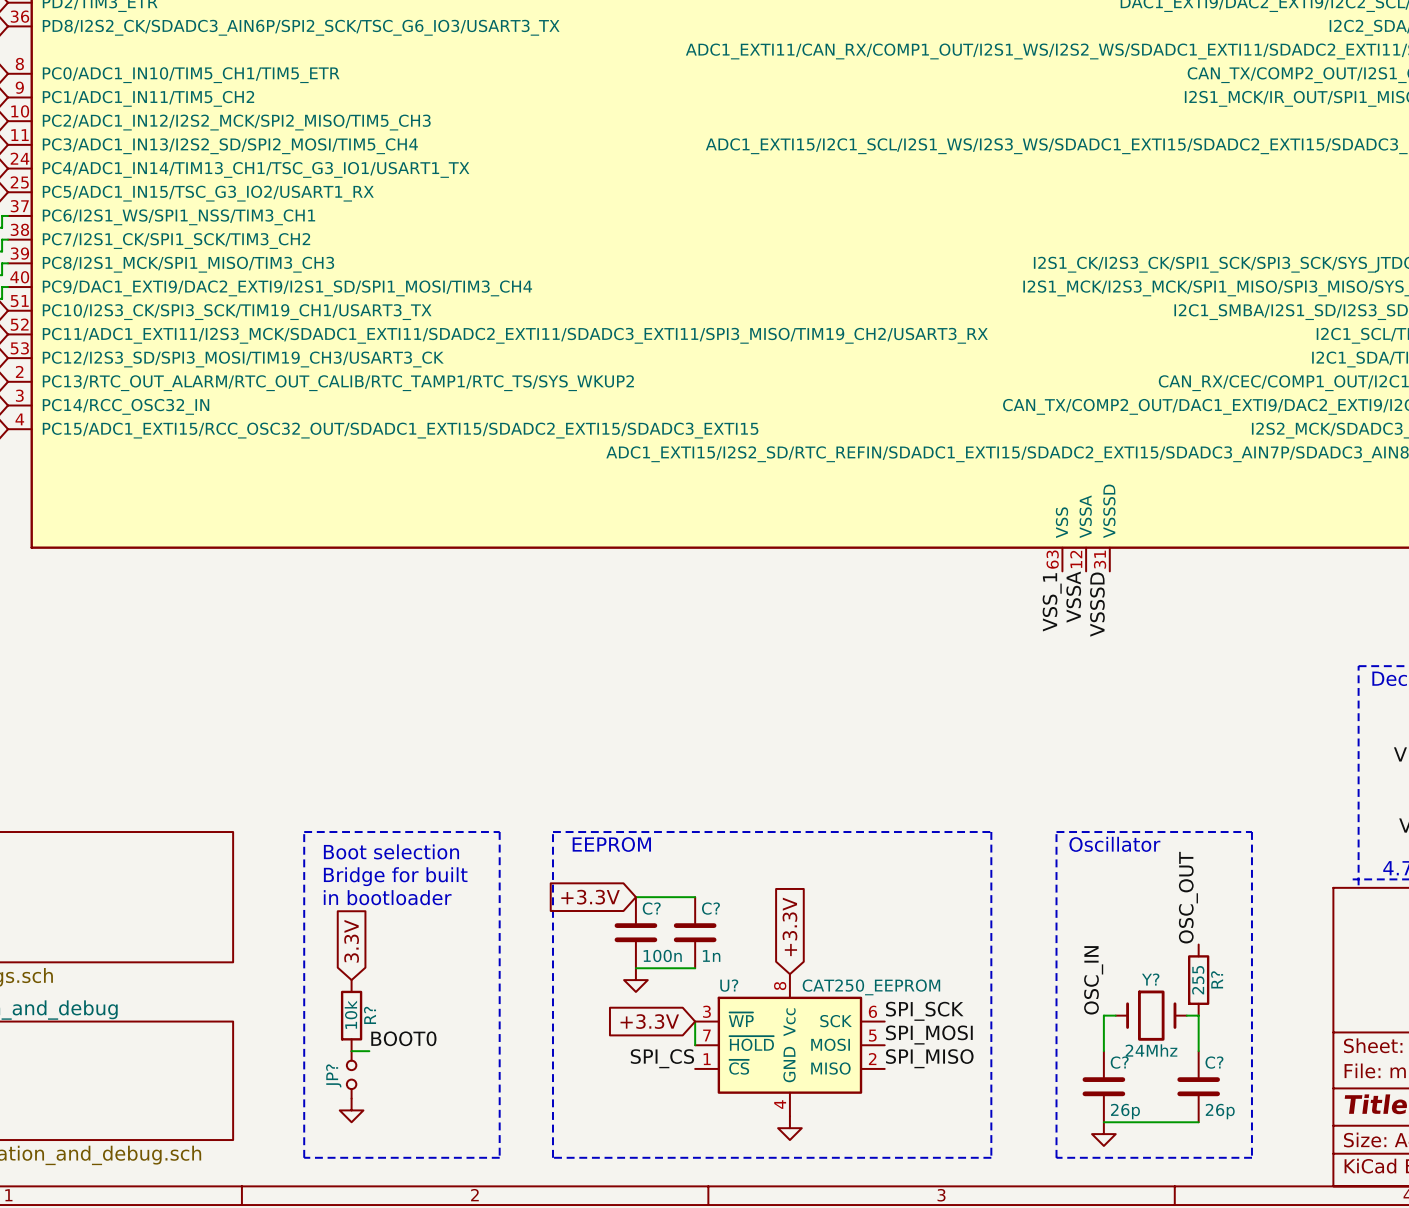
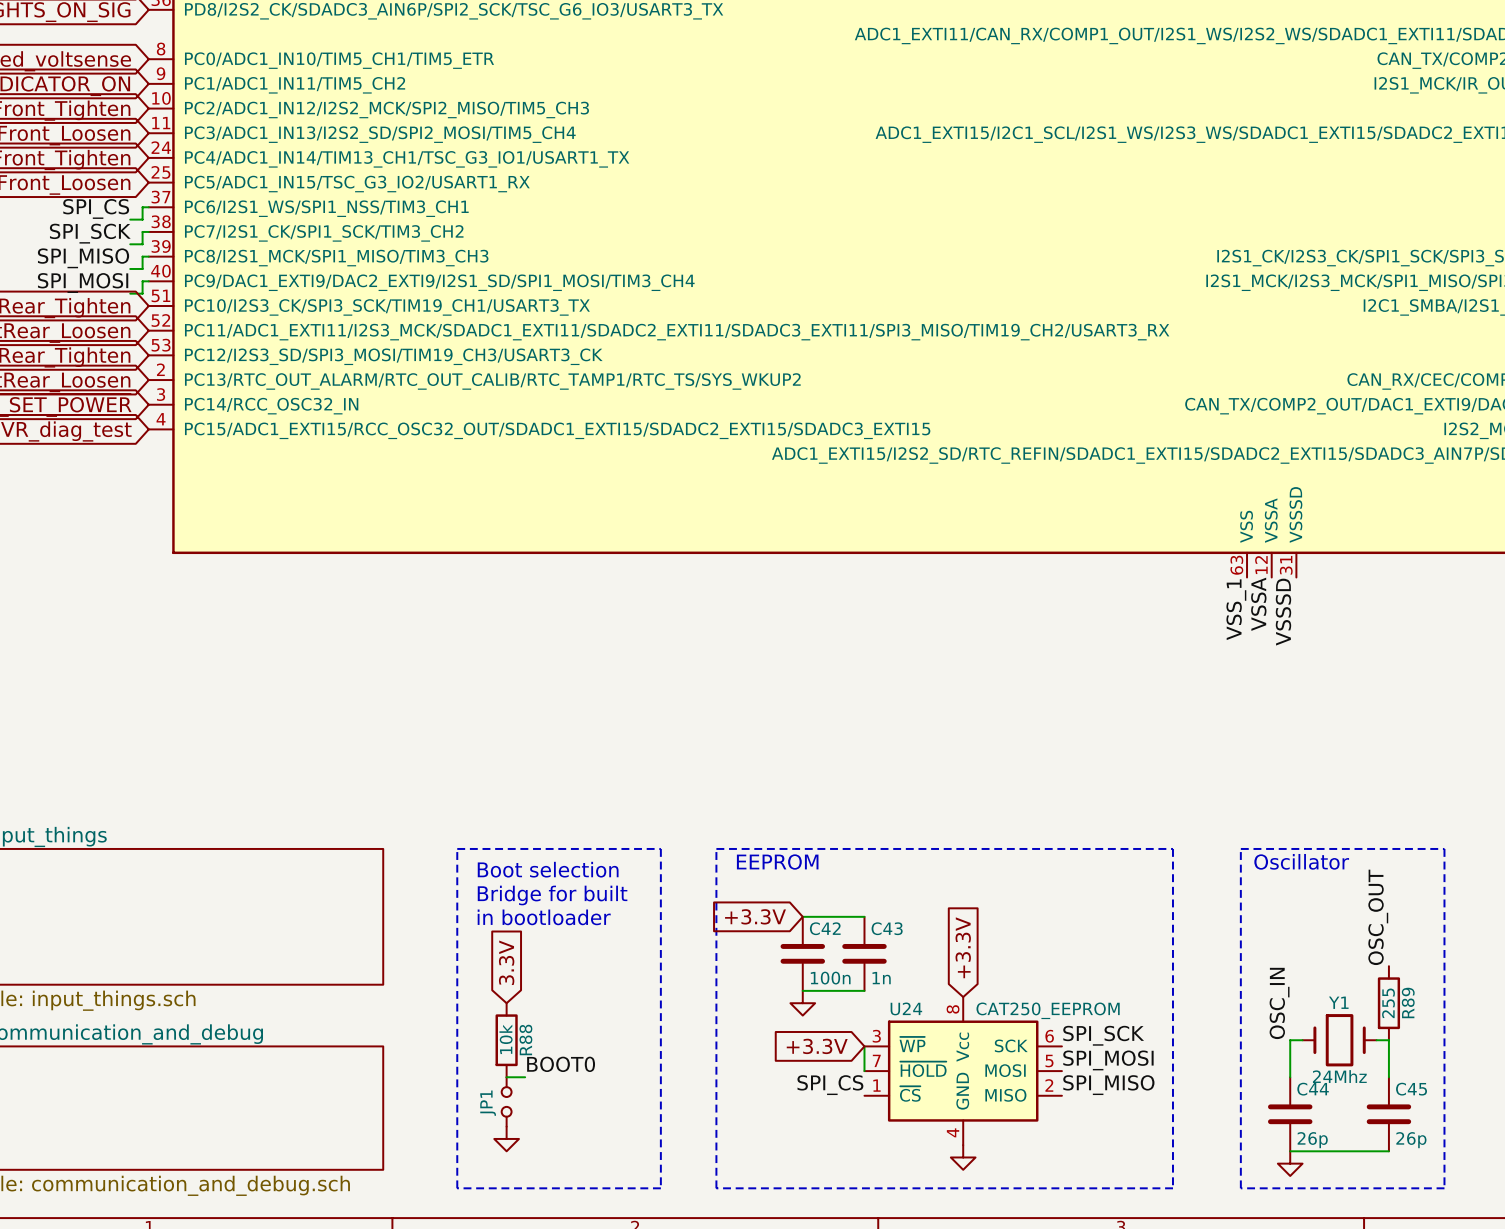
C? name: C? (651, 908) -> C42 (825, 928)
C? name: C? (710, 908) -> C43 (887, 928)
Y? name: Y? (1150, 979) -> Y1 (1338, 1002)
R? name: R? (1217, 979) -> R89 (1408, 1002)
U? name: U? (729, 985) -> U24 (906, 1008)
R? name: R? (370, 1015) -> R88 (525, 1039)
C? name: C? (1119, 1062) -> C44 (1313, 1089)
C? name: C? (1214, 1062) -> C45 (1411, 1089)
JP? name: JP? (333, 1075) -> JP1 (488, 1103)

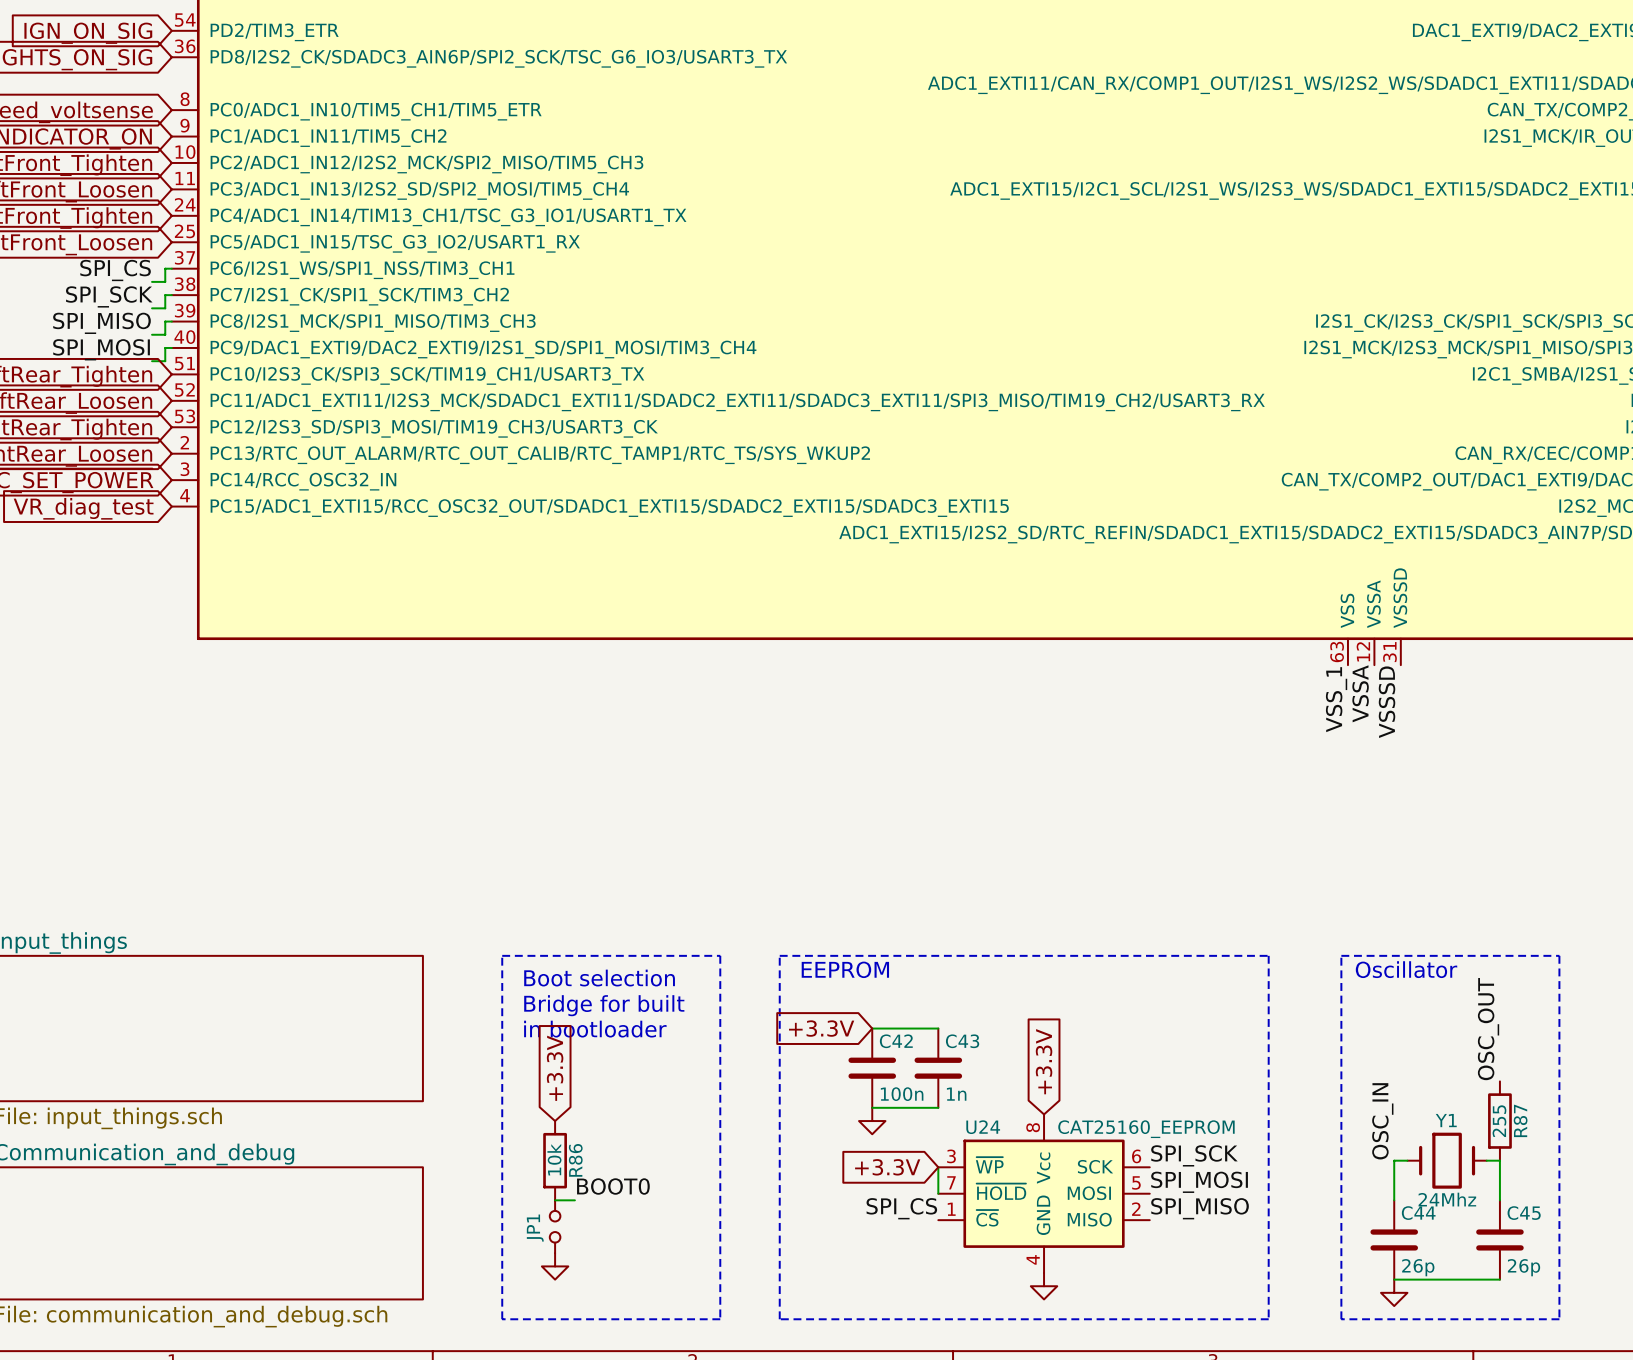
global label: 3.3V (506, 962) -> +3.3V (555, 1068)
R89 name: R89 (1408, 1002) -> R87 (1520, 1120)
U24 value: CAT250_EEPROM (1048, 1010) -> CAT25160_EEPROM (1146, 1129)
R88 name: R88 (525, 1039) -> R86 (575, 1160)

